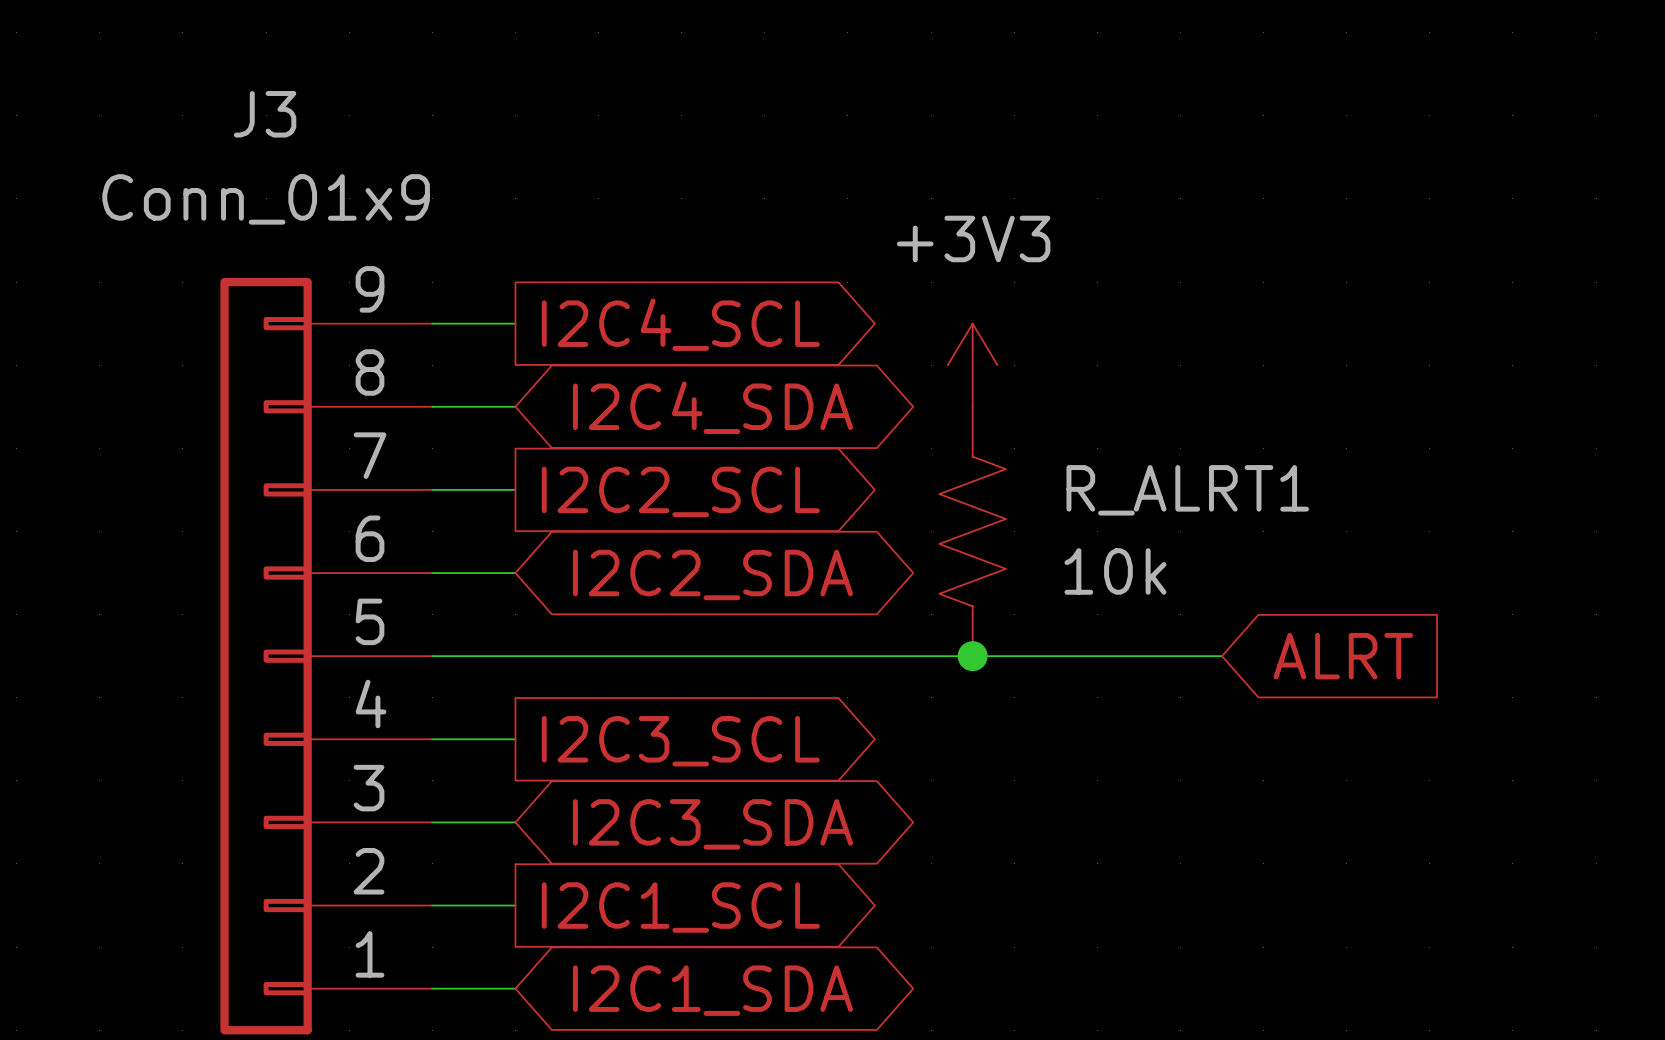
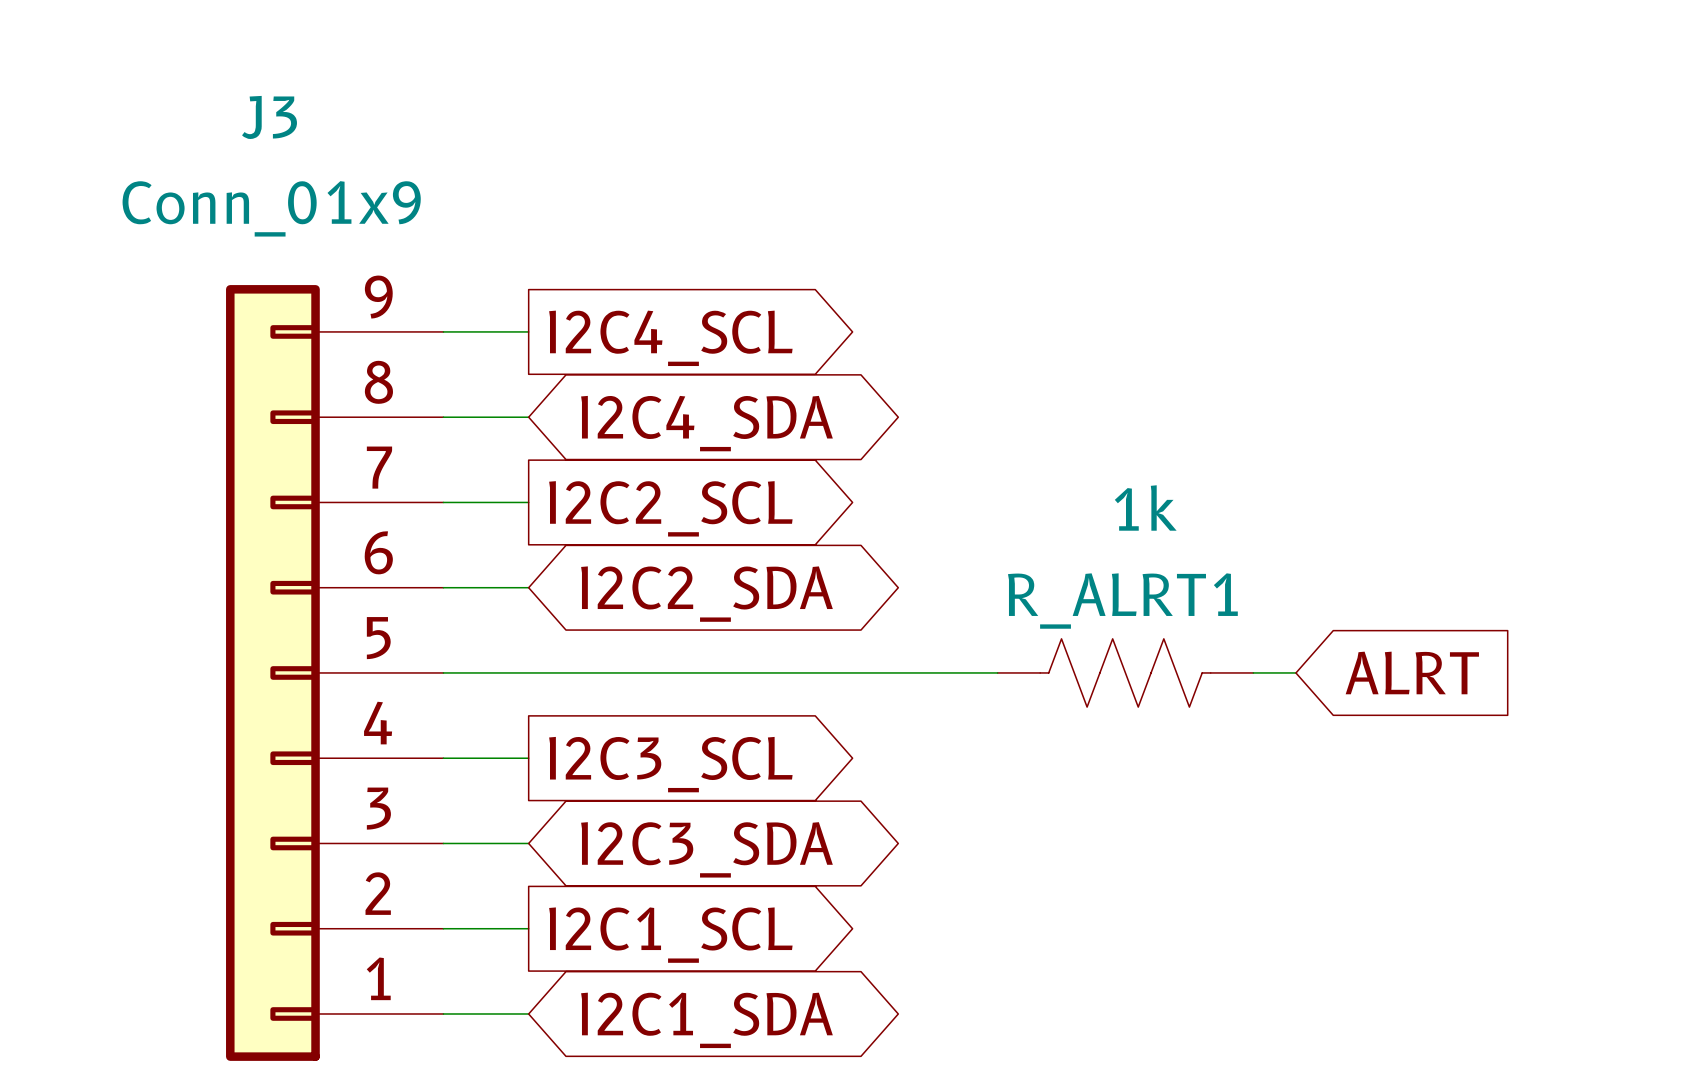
power symbol: +3V3 (972, 365) -> none
R_ALRT1 name position: R_ALRT1 (1187, 490) -> R_ALRT1 (1122, 601)
R_ALRT1 rotation: 0° (972, 531) -> 90° clockwise (1125, 672)
R_ALRT1 position: (972, 531) -> (1125, 672)
R_ALRT1 value: 10k (1115, 571) -> 1k (1145, 507)
wire: (972, 656) (1222, 656) -> (1295, 672) (1253, 672)
junction: (972, 656) -> none
global label position: ALRT (1343, 656) -> ALRT (1412, 672)

